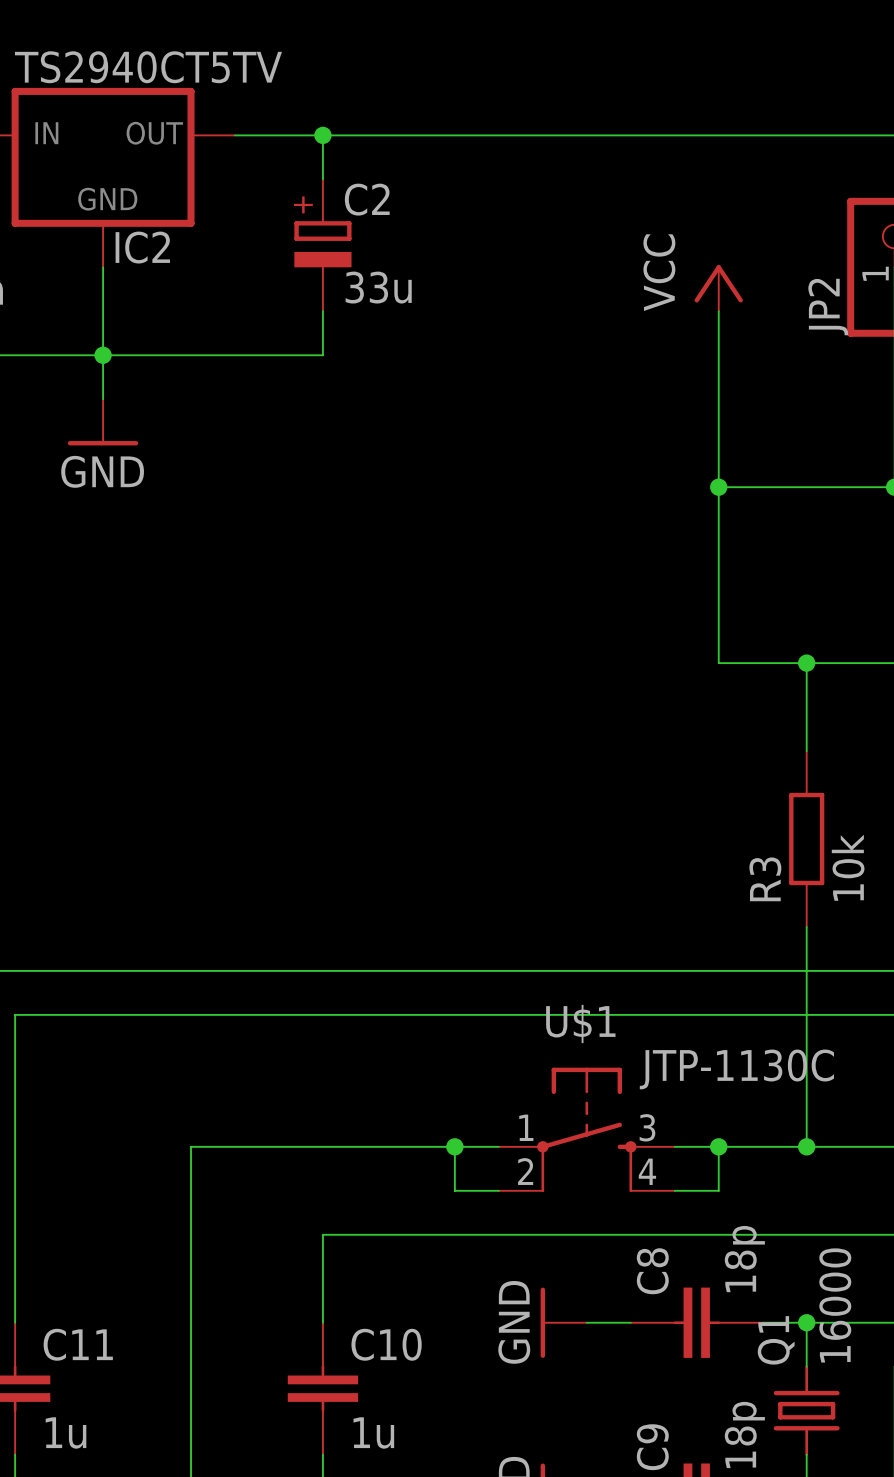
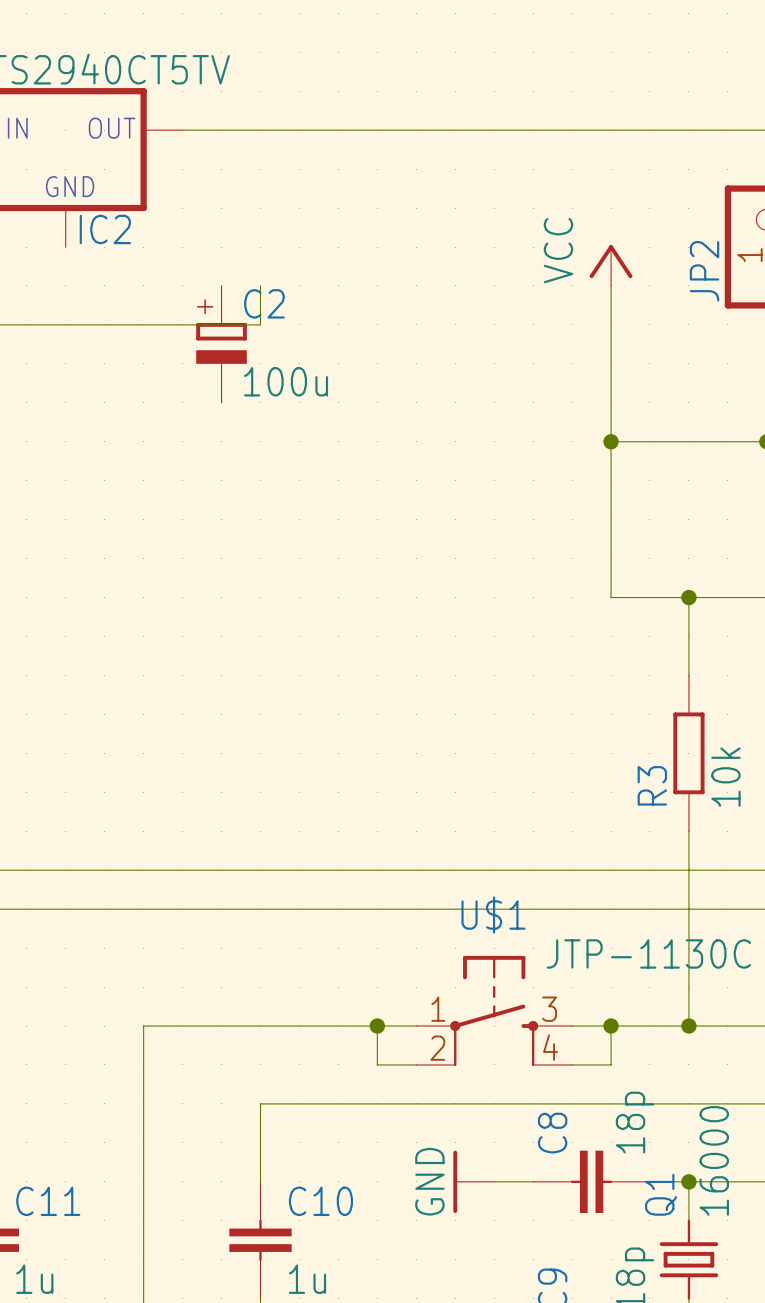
wire: (322, 135) (322, 179) -> none
junction: (322, 135) -> none
C2 position: (322, 245) -> (221, 344)
wire: (103, 267) (103, 399) -> none
C2 value: 33u (378, 287) -> 100u (286, 381)
junction: (103, 355) -> none
power symbol: GND (103, 422) -> none

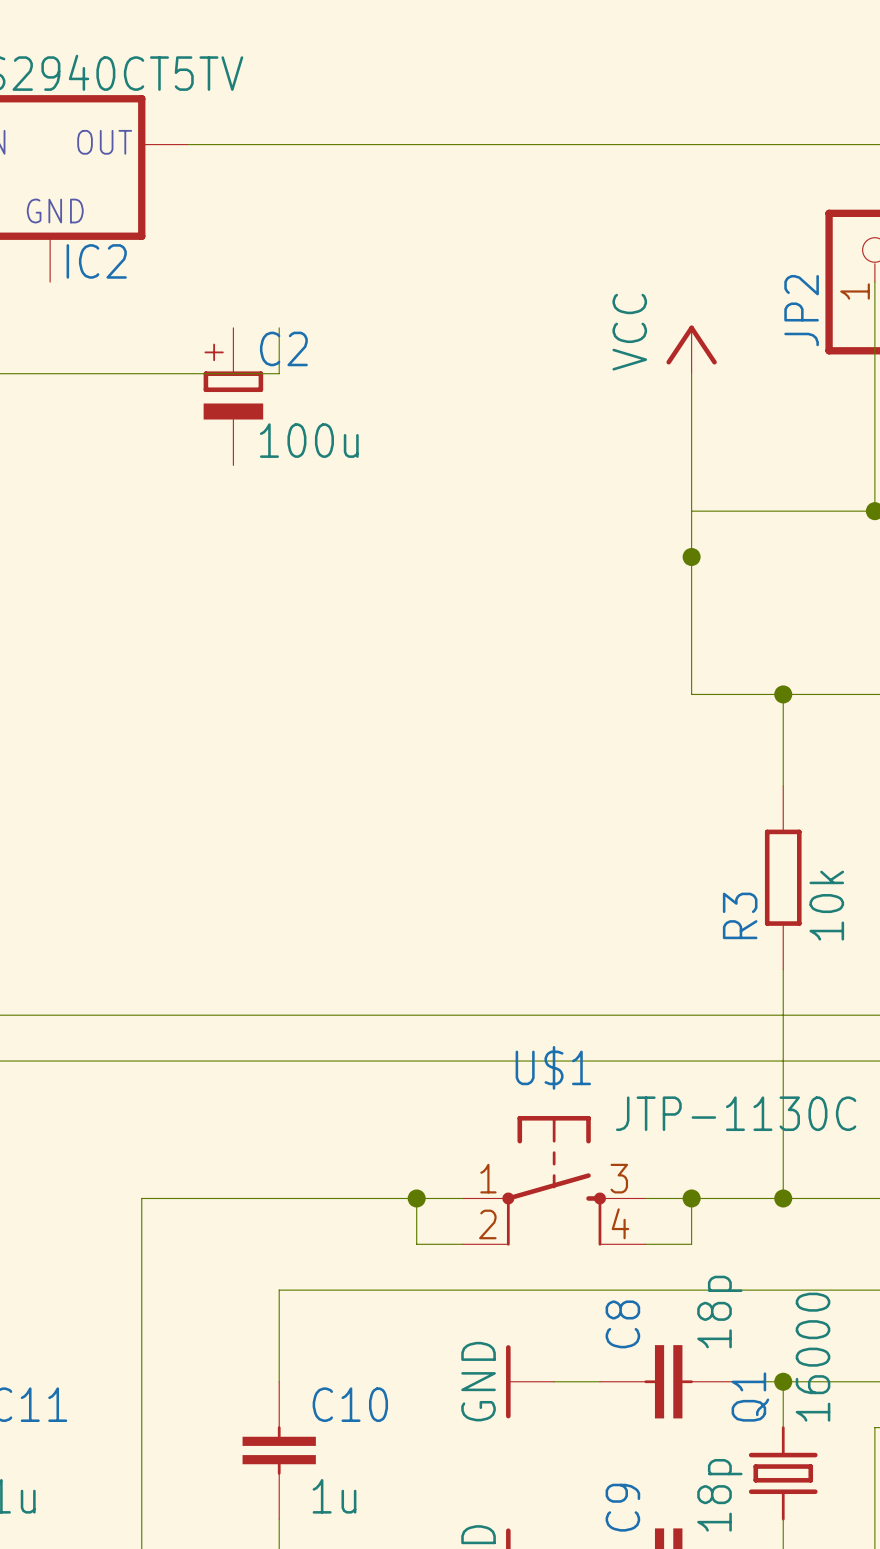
power symbol position: VCC (611, 265) -> VCC (691, 349)
junction position: (611, 441) -> (691, 556)

